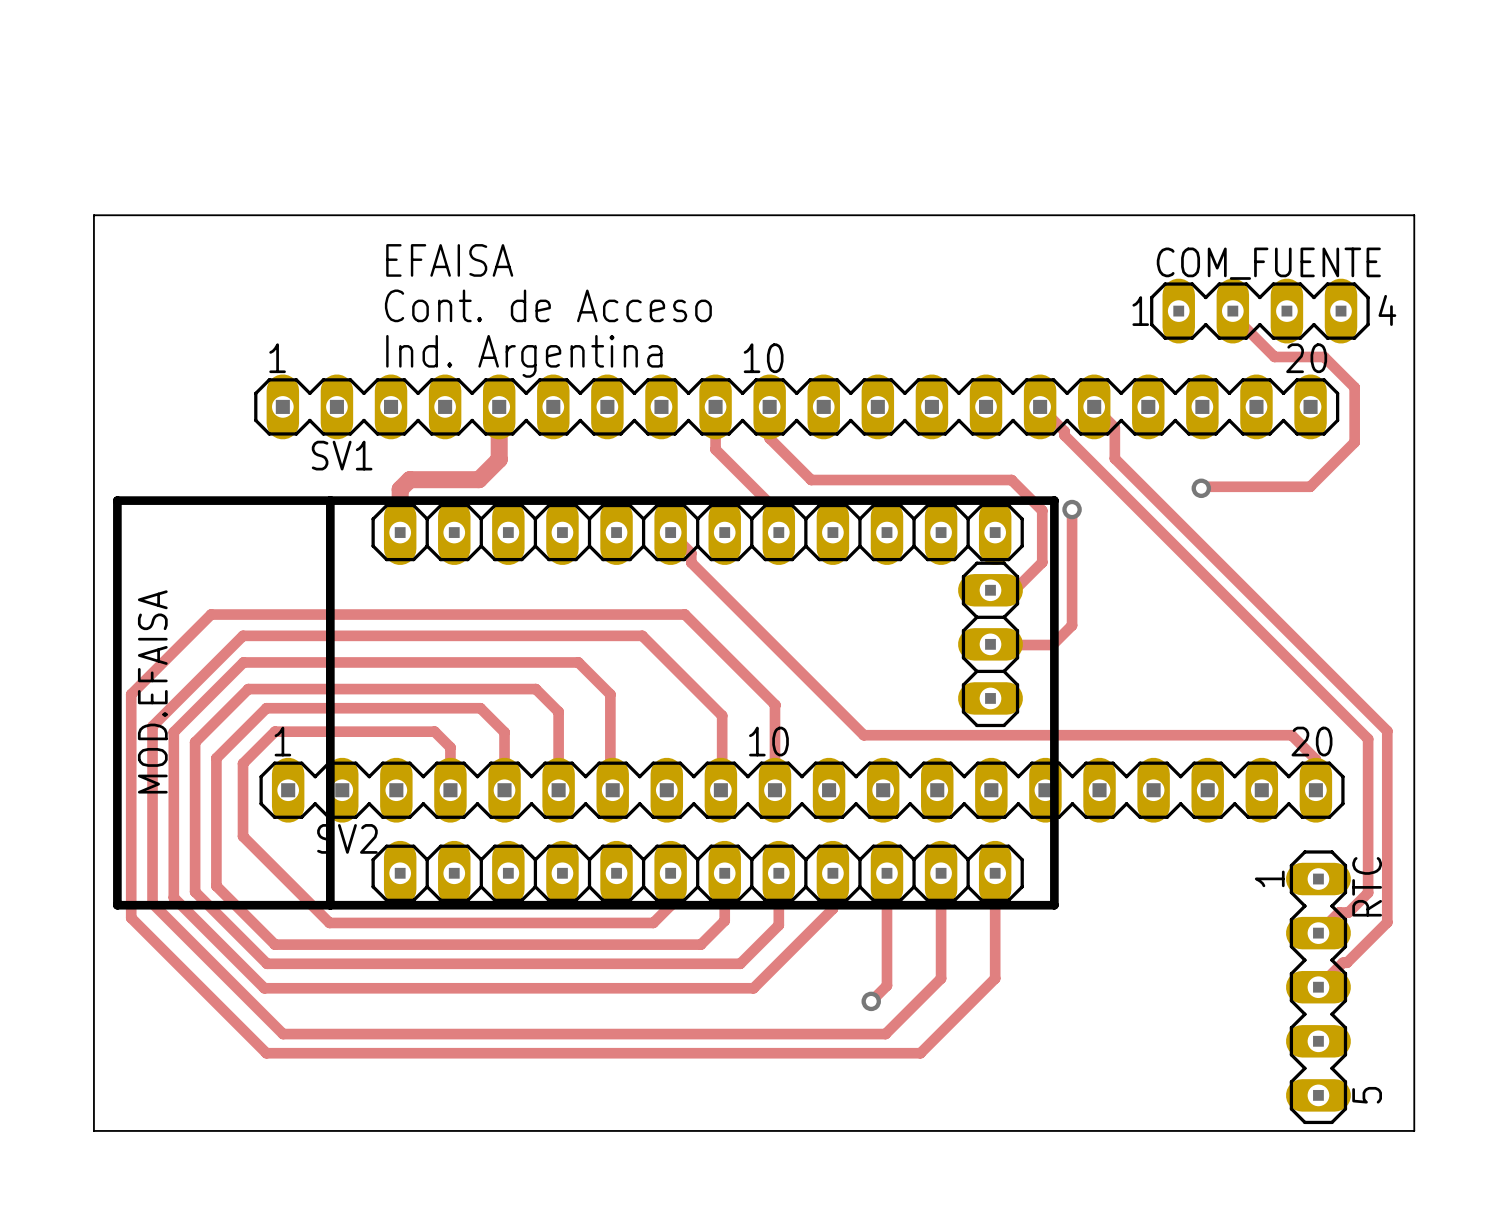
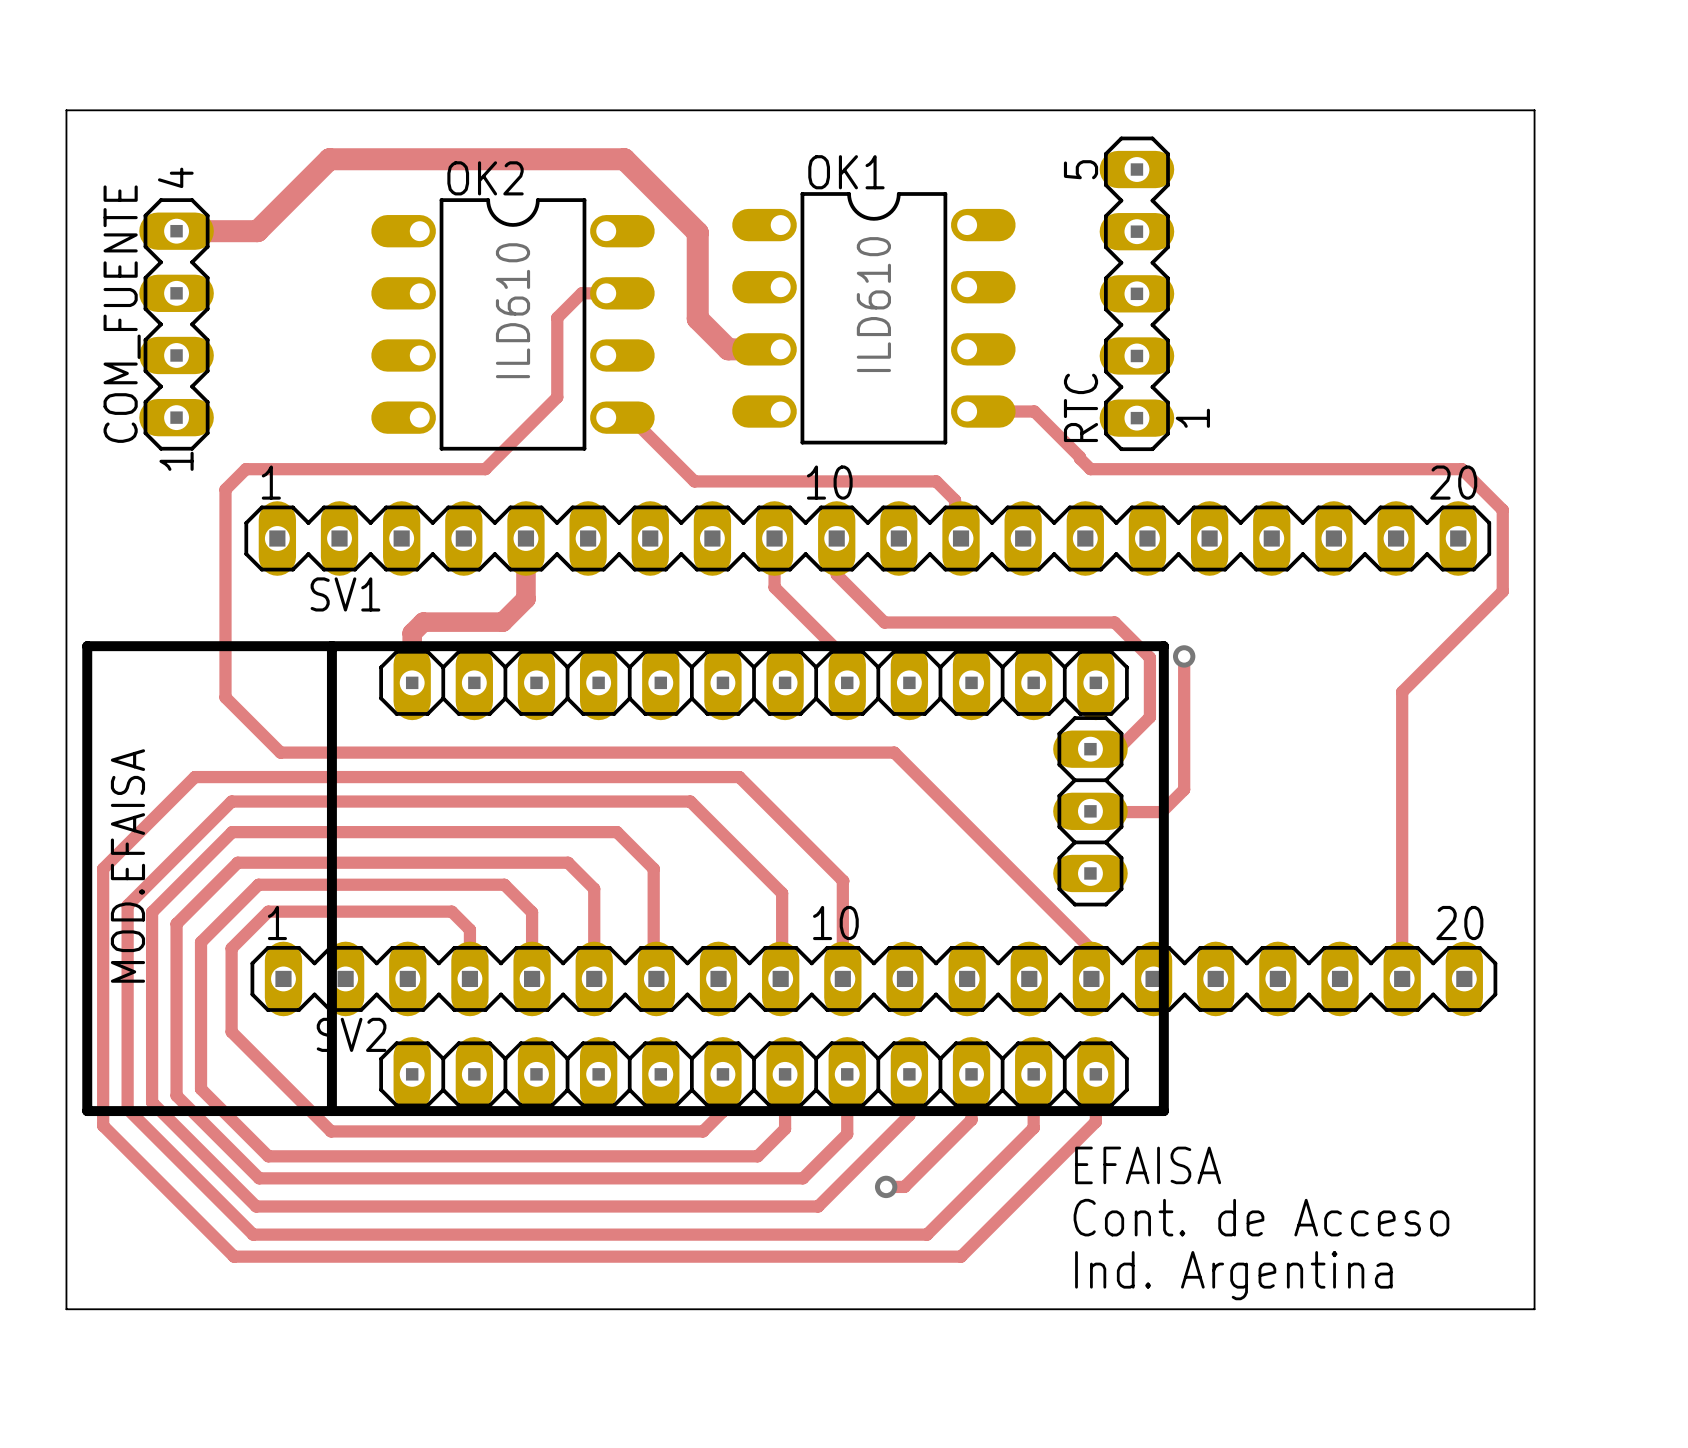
track: none -> (176, 231) (257, 231) (329, 159) (624, 159) (697, 232) (697, 318) (728, 349) (780, 349)
track: none -> (606, 293) (581, 293) (557, 317) (557, 397) (485, 469) (245, 469) (225, 489) (225, 697) (280, 752) (894, 752) (1090, 948) (1091, 978)
RTC: none -> (1136, 293)
board edge: (93, 215) (1414, 215) (1414, 1130) (93, 1130) (93, 215) -> (66, 110) (66, 1309) (1534, 1309) (1534, 110) (66, 110)
OK1: none -> ILD610 (873, 318)
COM_FUENTE: none -> (176, 324)
OK2: none -> ILD610 (513, 324)
text: EFAISA (449, 260) -> none
track: none -> (606, 417) (630, 417) (694, 481) (936, 481) (955, 500) (955, 532) (961, 538)
text: Cont. de Acceso (548, 305) -> none
track: (1232, 311) (1232, 315) (1274, 356) (1324, 356) -> (967, 411) (1034, 411) (1090, 469) (1461, 469) (1473, 481)
COM_FUENTE: (1259, 311) -> none
text: Ind. Argentina (524, 356) -> none
track: (1349, 382) (1354, 387) (1354, 442) (1310, 486) (1202, 486) (1201, 488) -> (1502, 510) (1502, 591) (1402, 692) (1402, 978)
track: (1040, 406) (1064, 431) (1064, 435) (1368, 739) (1368, 892) (1348, 912) (1339, 912) (1318, 933) -> none
track: (1094, 406) (1114, 427) (1114, 458) (1387, 731) (1387, 922) (1346, 962) (1342, 962) (1318, 987) -> none
via: (1201, 488) -> none
track: (670, 532) (691, 553) (691, 562) (863, 735) (1291, 735) (1315, 759) (1315, 790) -> none
track: (886, 912) (886, 985) (871, 1001) -> (971, 1119) (904, 1186) (886, 1186)
track: (995, 914) (995, 978) (920, 1053) (266, 1053) (245, 1031) -> (1095, 1121) (961, 1256) (234, 1256)
track: (941, 919) (941, 978) (885, 1034) (283, 1034) (261, 1012) -> (1033, 1128) (927, 1234) (253, 1234)
text: none -> EFAISA (1148, 1165)
RTC: (1318, 987) -> none
text: none -> Cont. de Acceso (1261, 1217)
via position: (871, 1001) -> (886, 1186)
text: none -> Ind. Argentina (1233, 1275)

